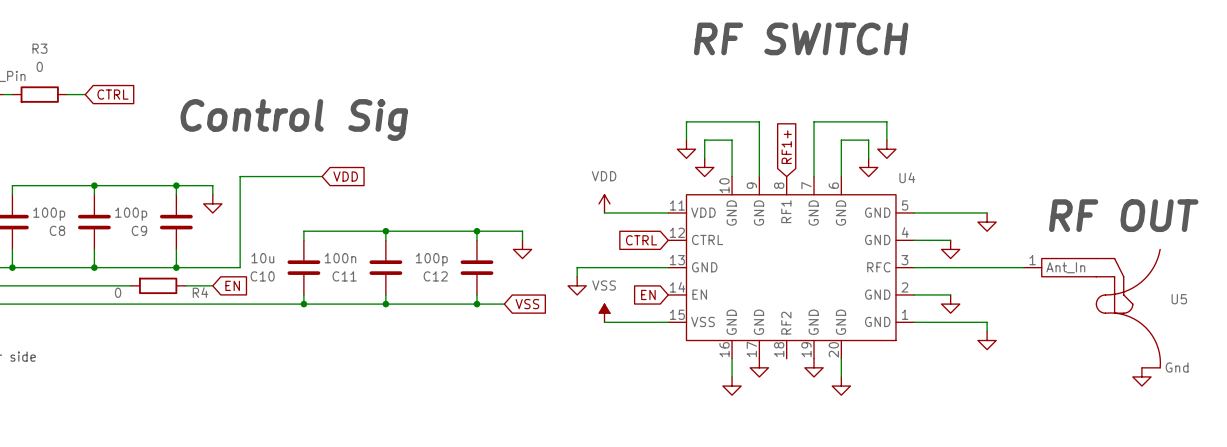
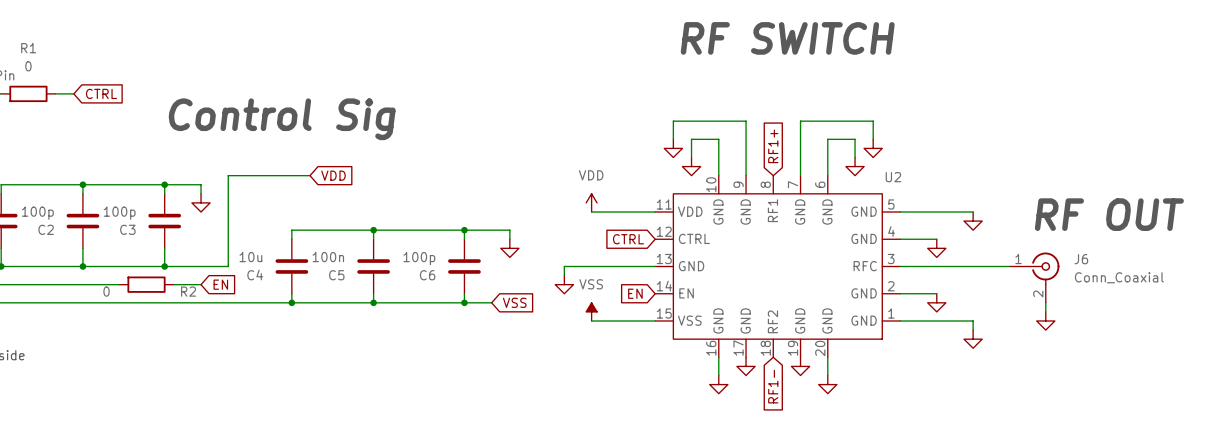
R3 name: R3 (39, 48) -> R1 (28, 48)
U4 name: U4 (907, 177) -> U2 (893, 177)
C8 name: C8 (57, 230) -> C2 (46, 229)
C9 name: C9 (139, 230) -> C3 (127, 229)
C10 name: C10 (262, 276) -> C4 (255, 275)
C11 name: C11 (344, 276) -> C5 (336, 275)
C12 name: C12 (435, 276) -> C6 (427, 275)
J6: none -> Conn_Coaxial (1034, 277)
R4 name: R4 (200, 292) -> R2 (188, 291)
wire: none -> (1045, 302) (1045, 311)
U5: (1091, 308) -> none
power symbol position: (1141, 376) -> (1045, 320)
global label: none -> RF1- (773, 386)

